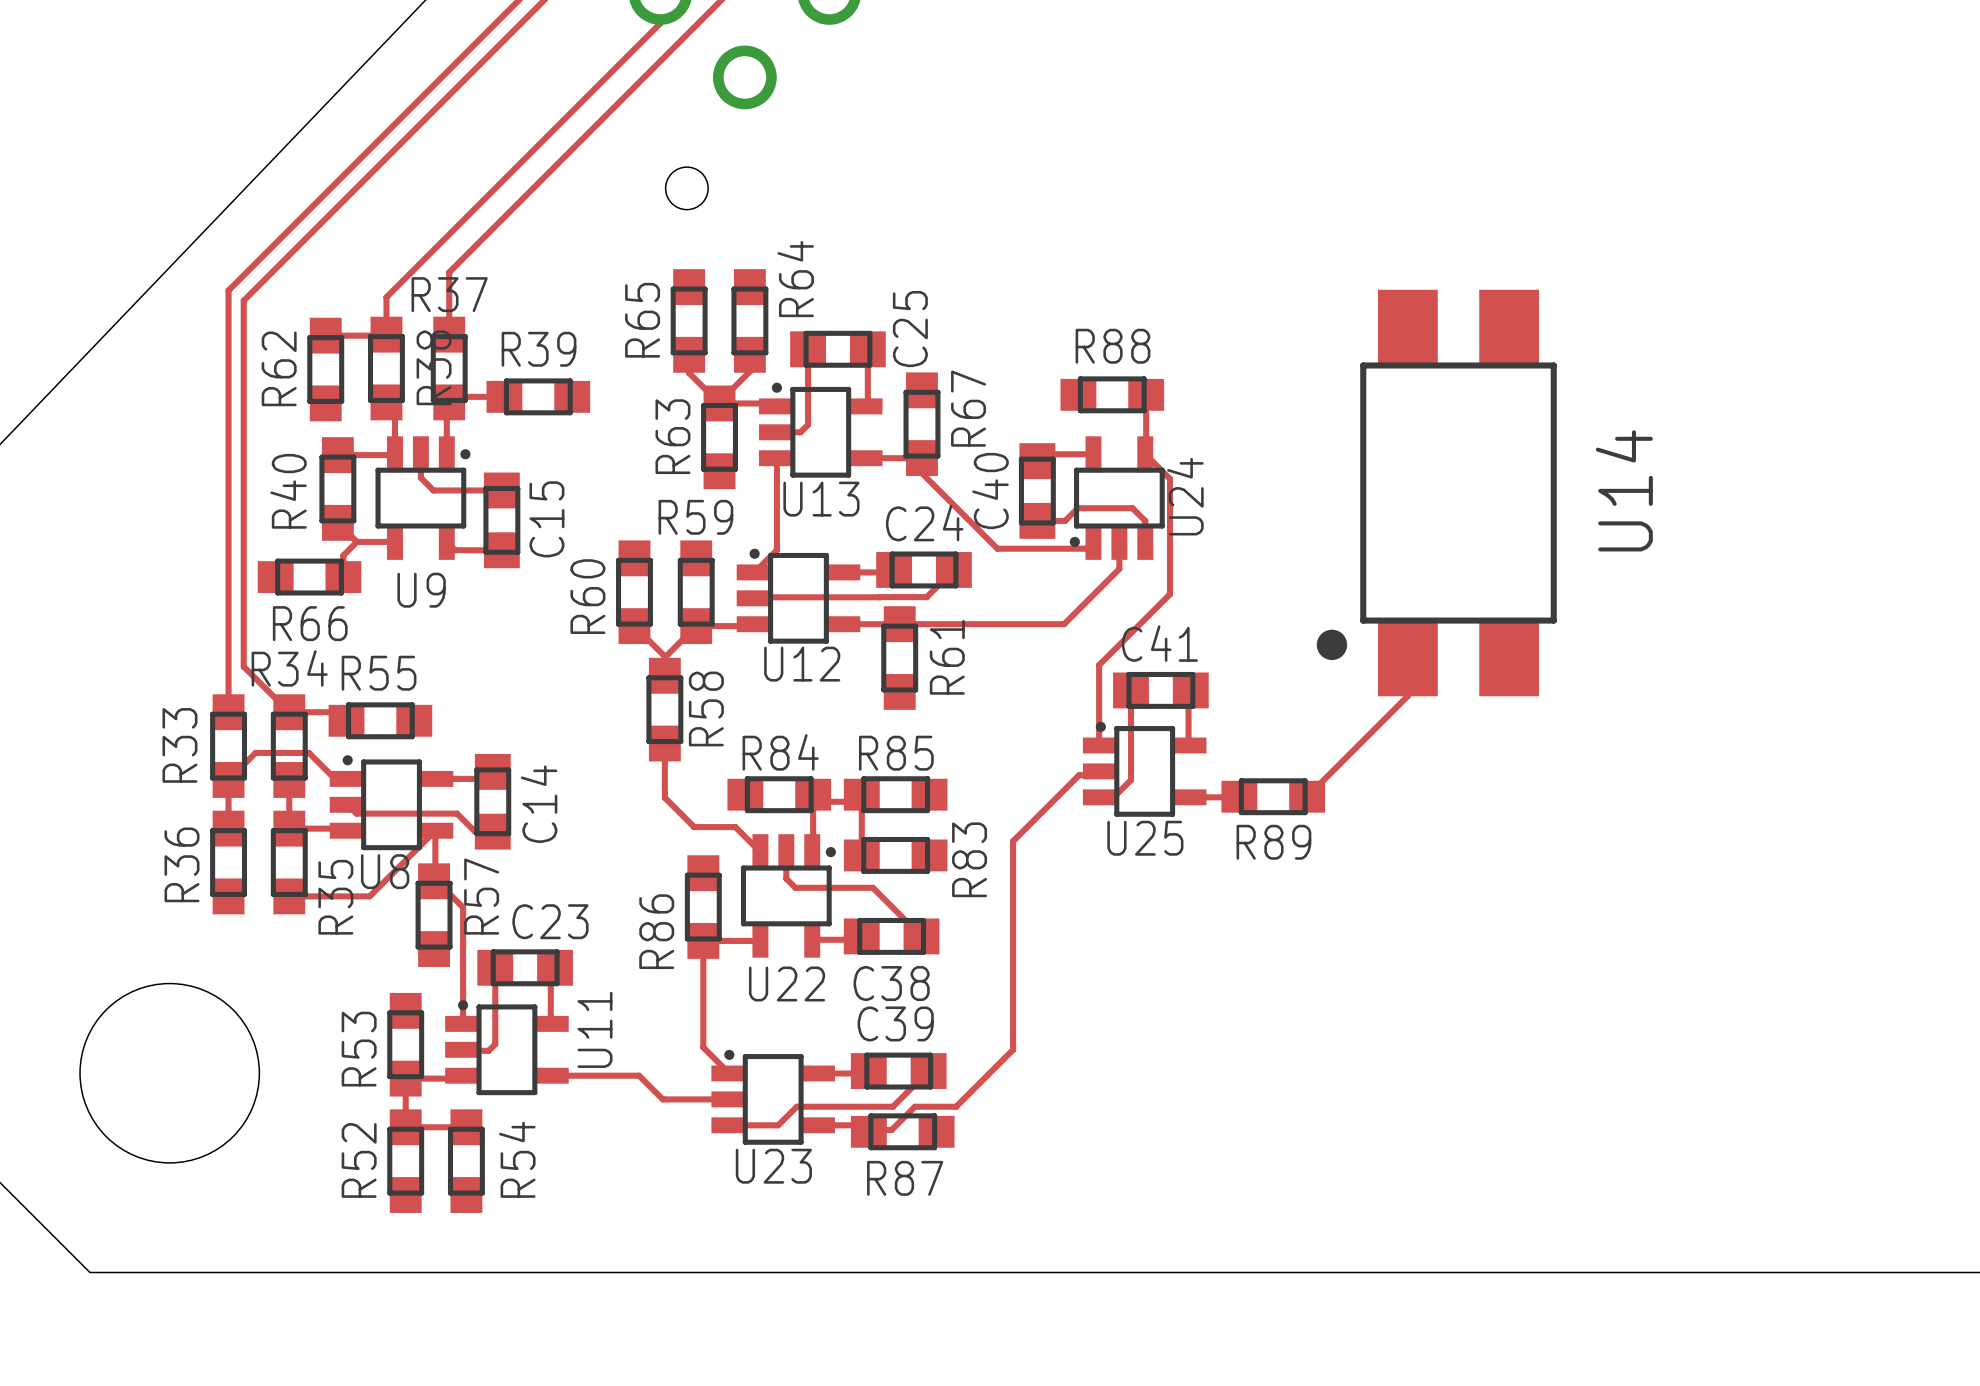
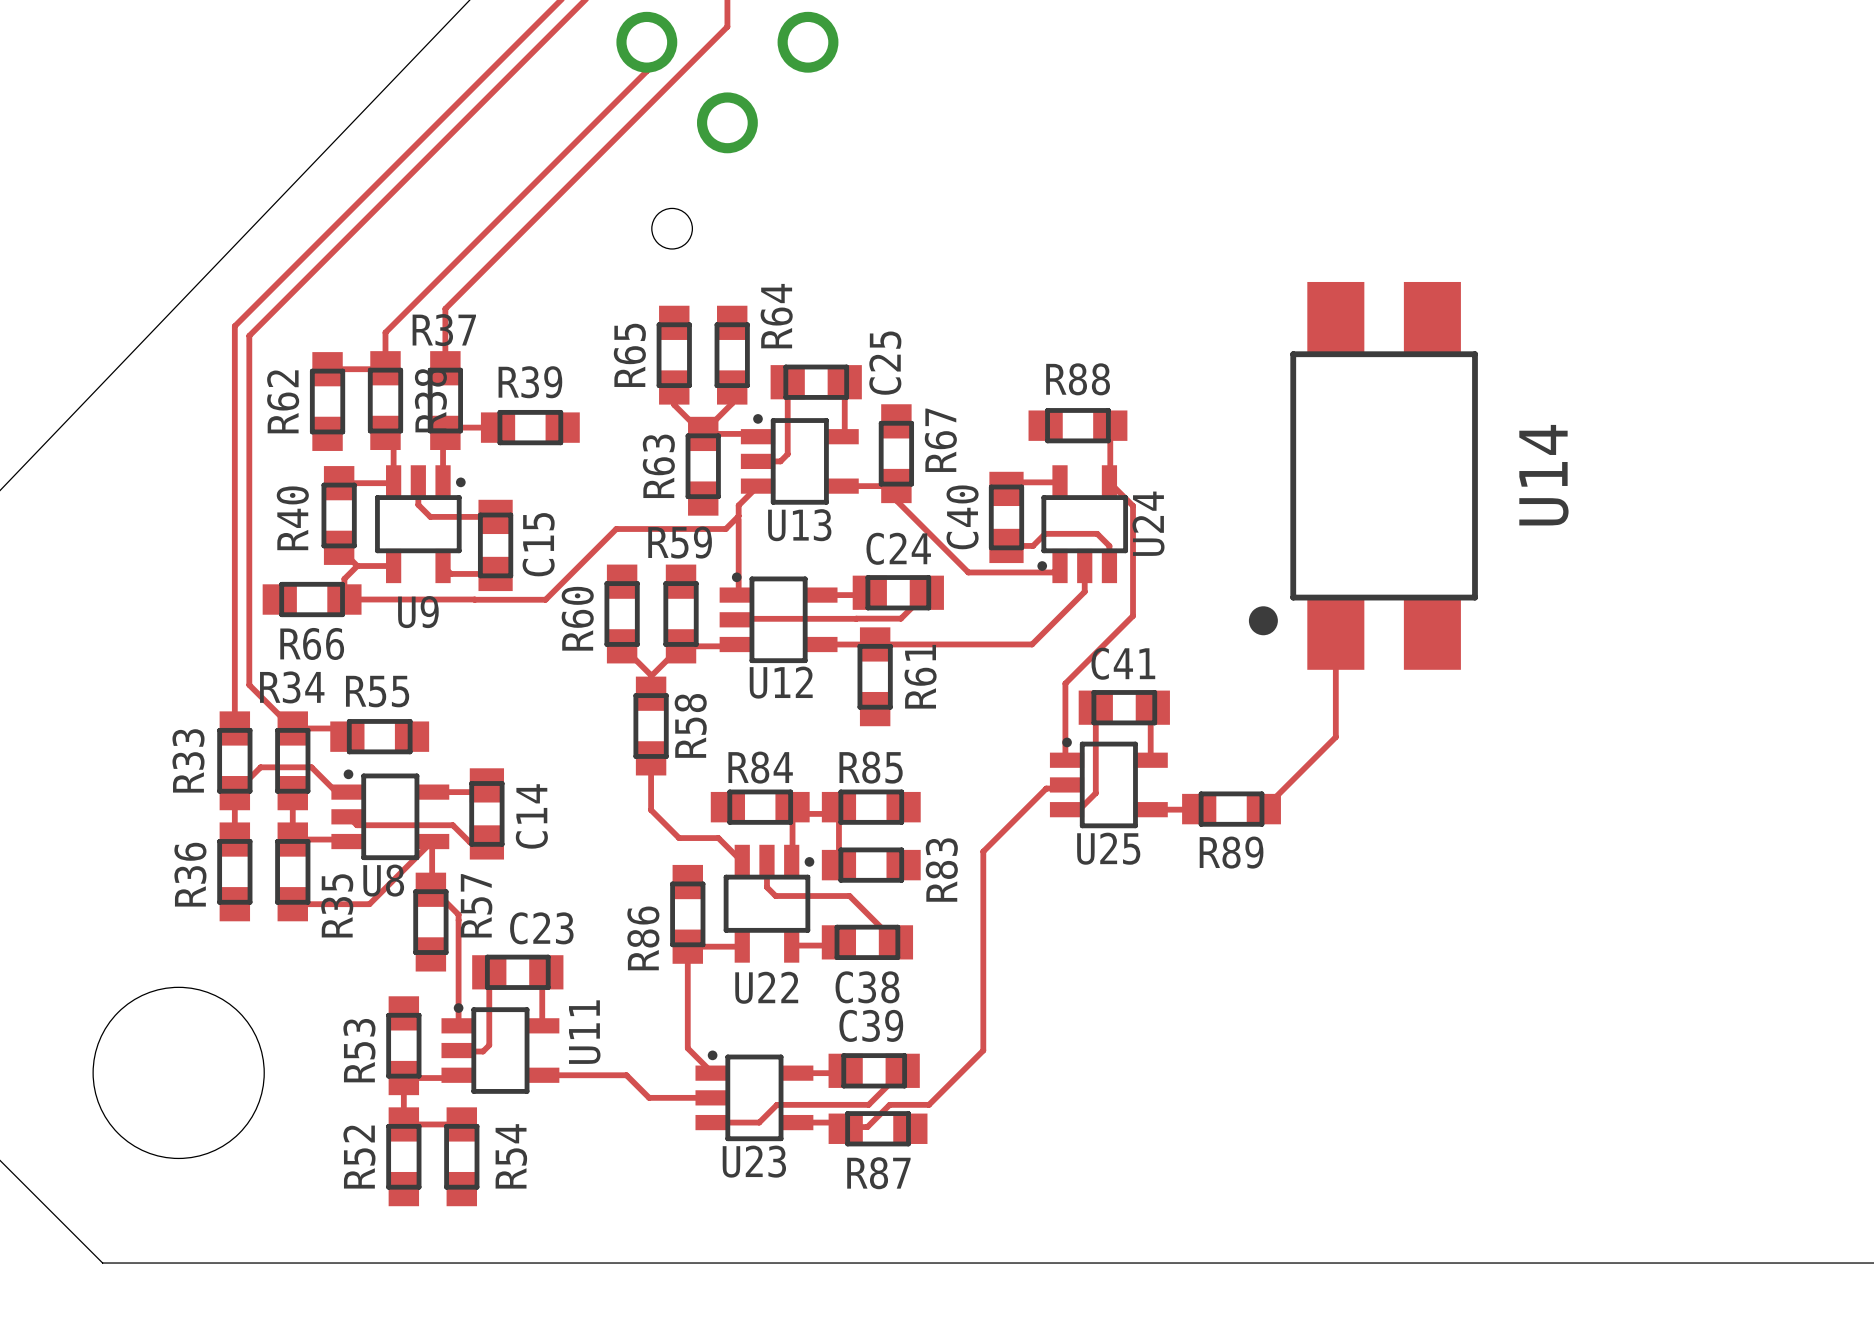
track: (776, 458) (776, 550) (756, 570) -> (738, 519) (738, 593)
track: none -> (757, 486) (738, 505) (738, 516) (725, 529) (616, 529) (545, 599) (474, 599)
U14 position: (1436, 493) -> (1363, 475)
track: none -> (344, 599) (474, 599)
track: (1407, 658) (1407, 695) (1382, 721) -> (1335, 633) (1335, 737)

